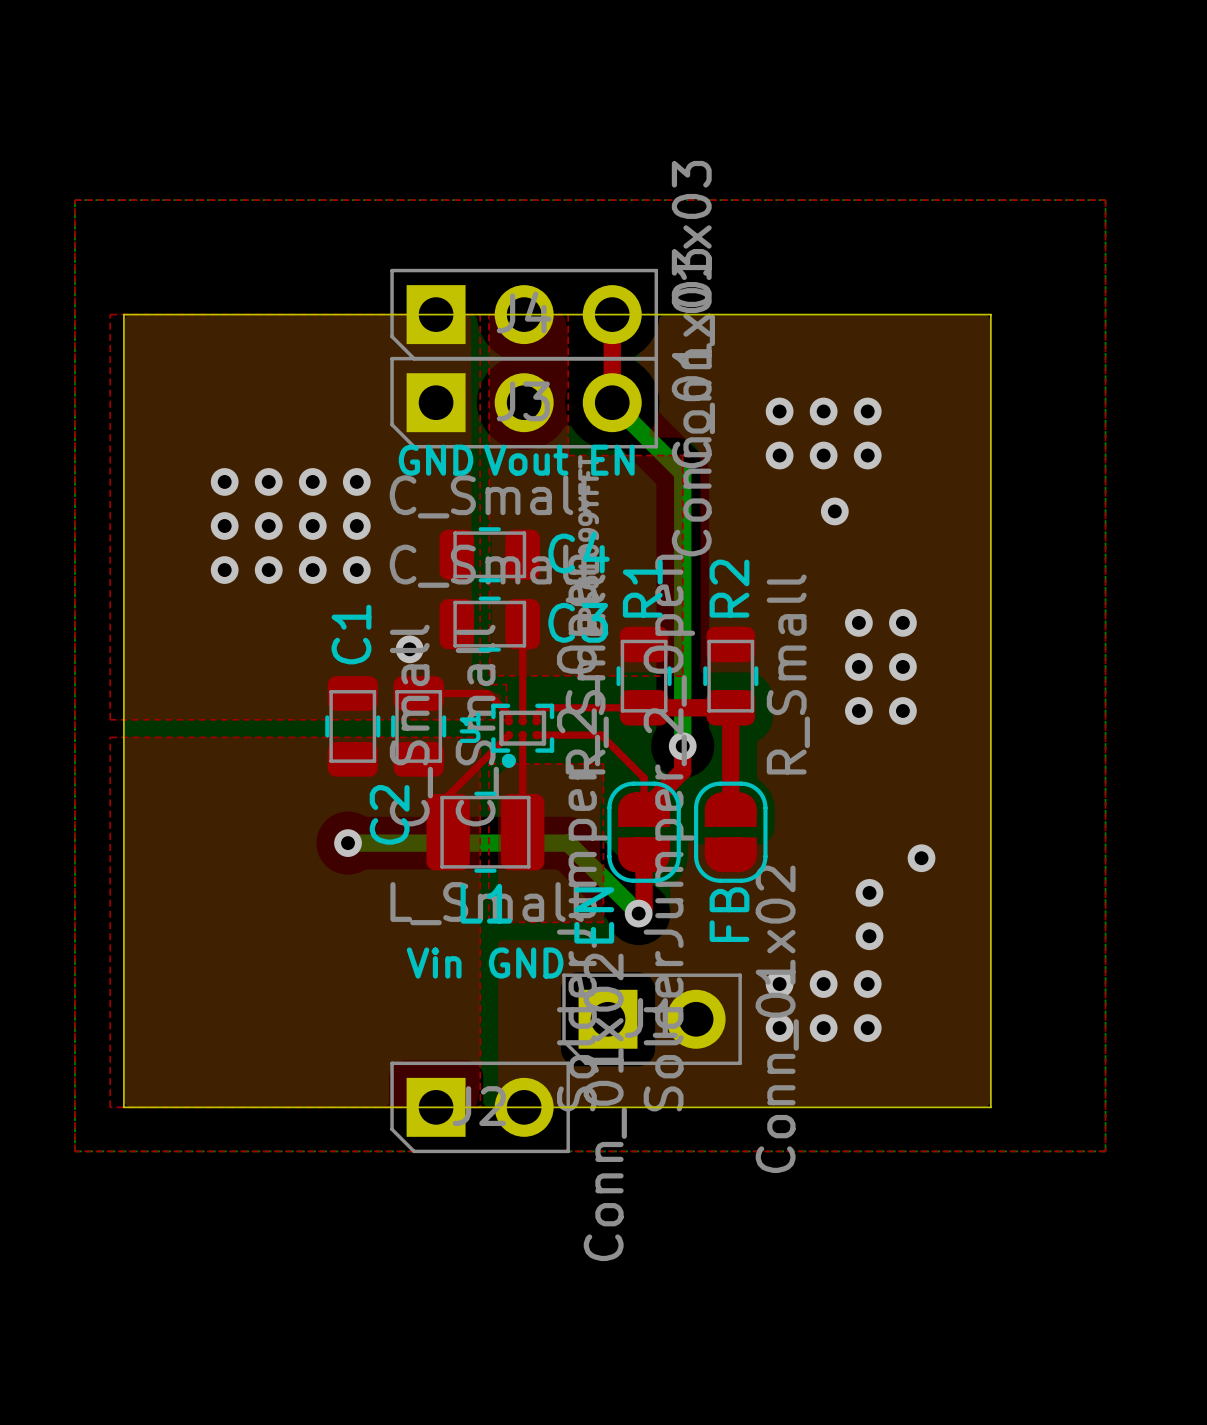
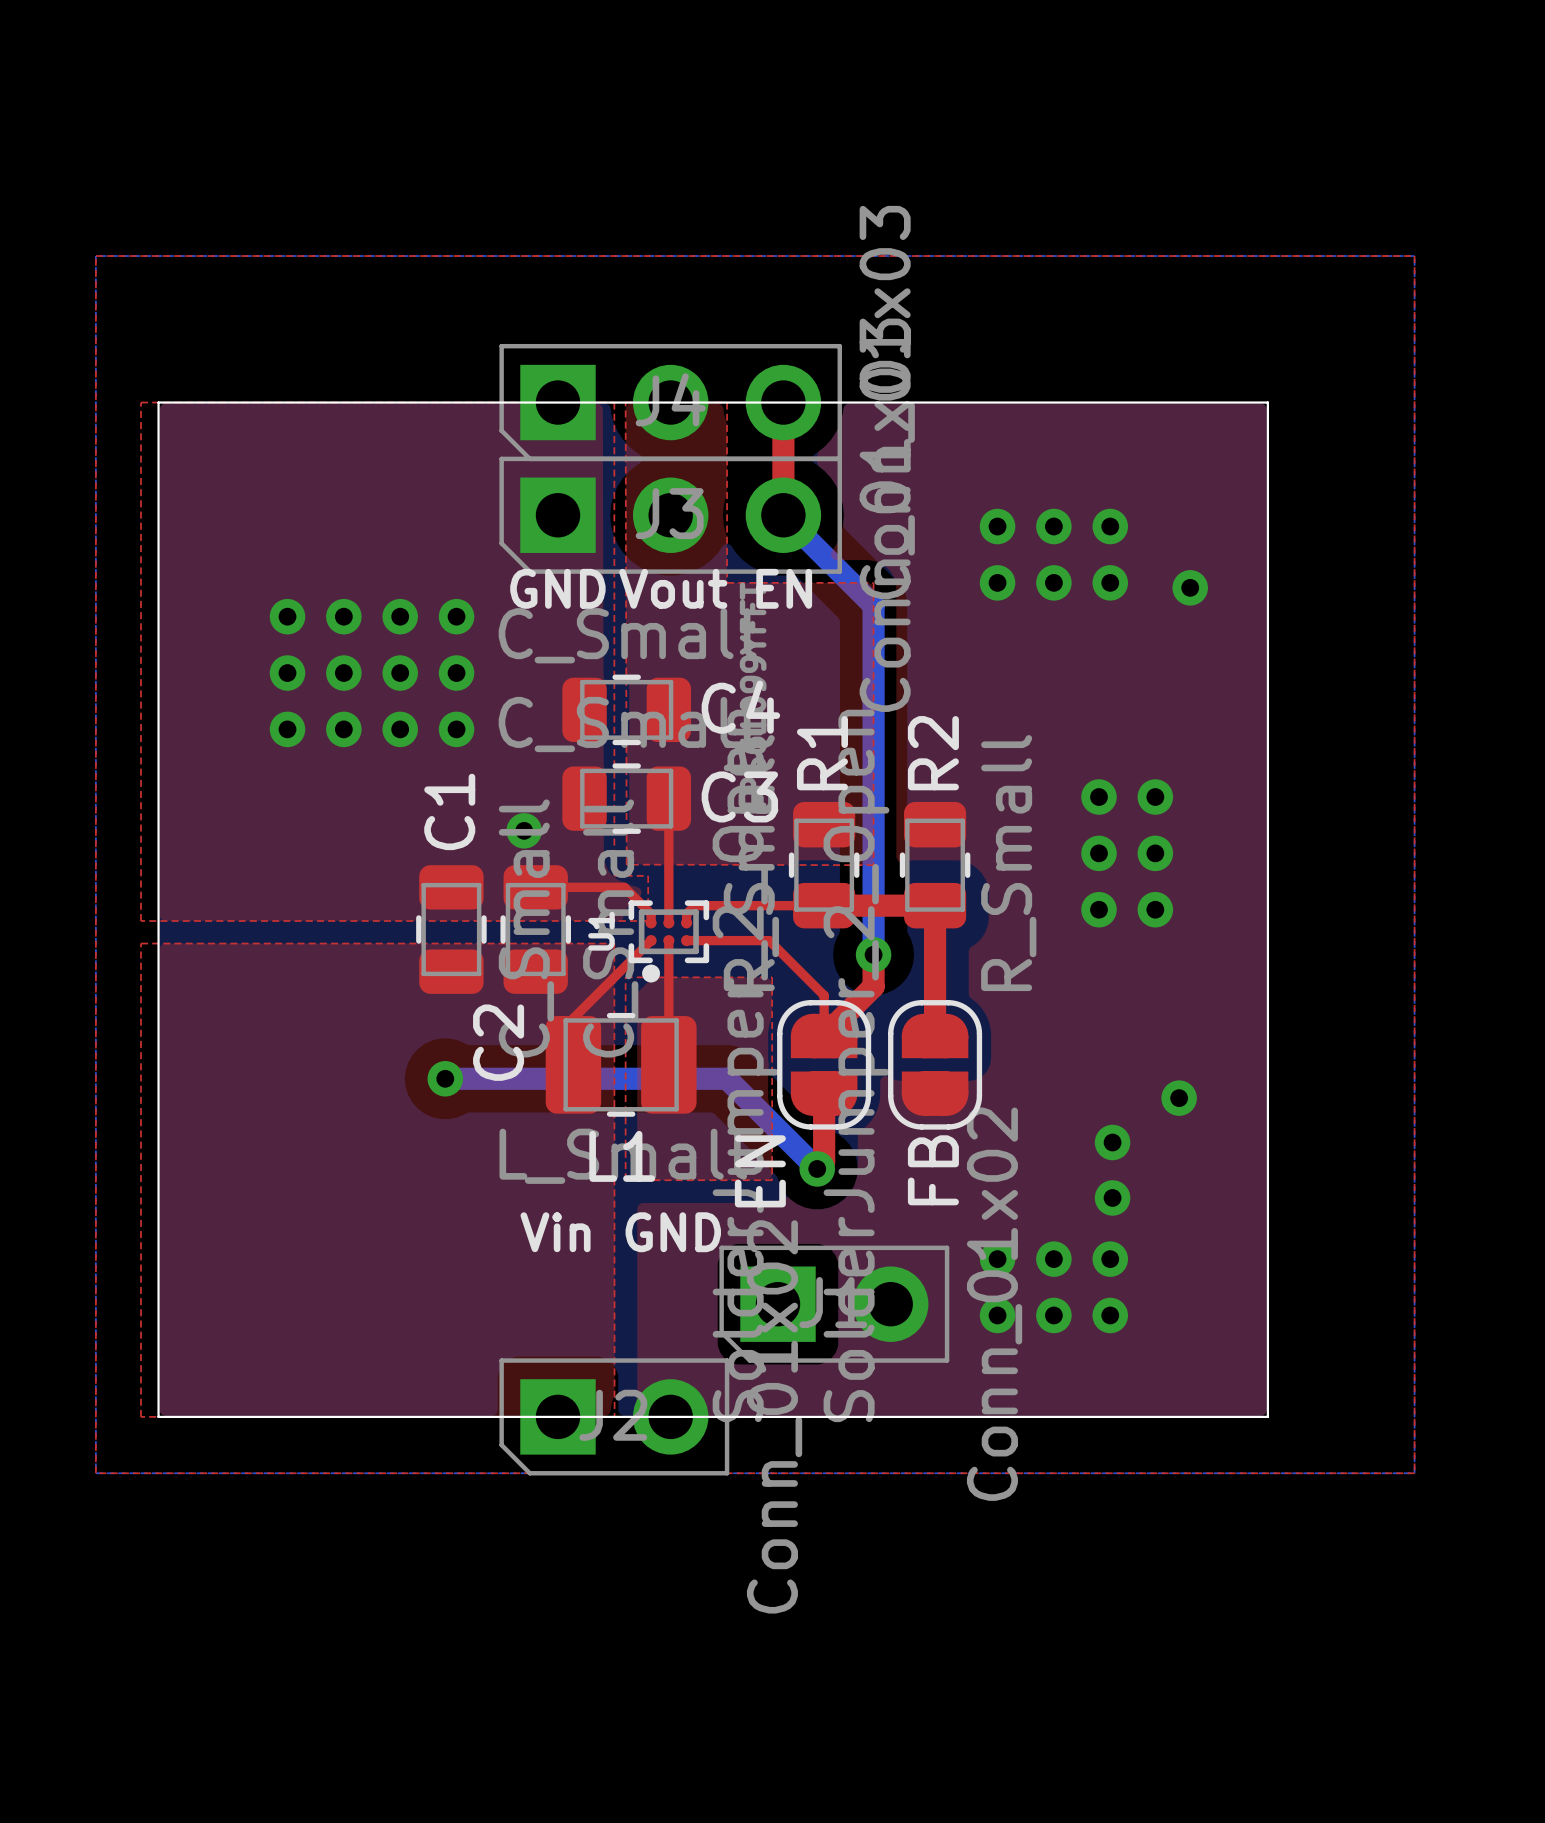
via position: (834, 511) -> (1190, 587)

